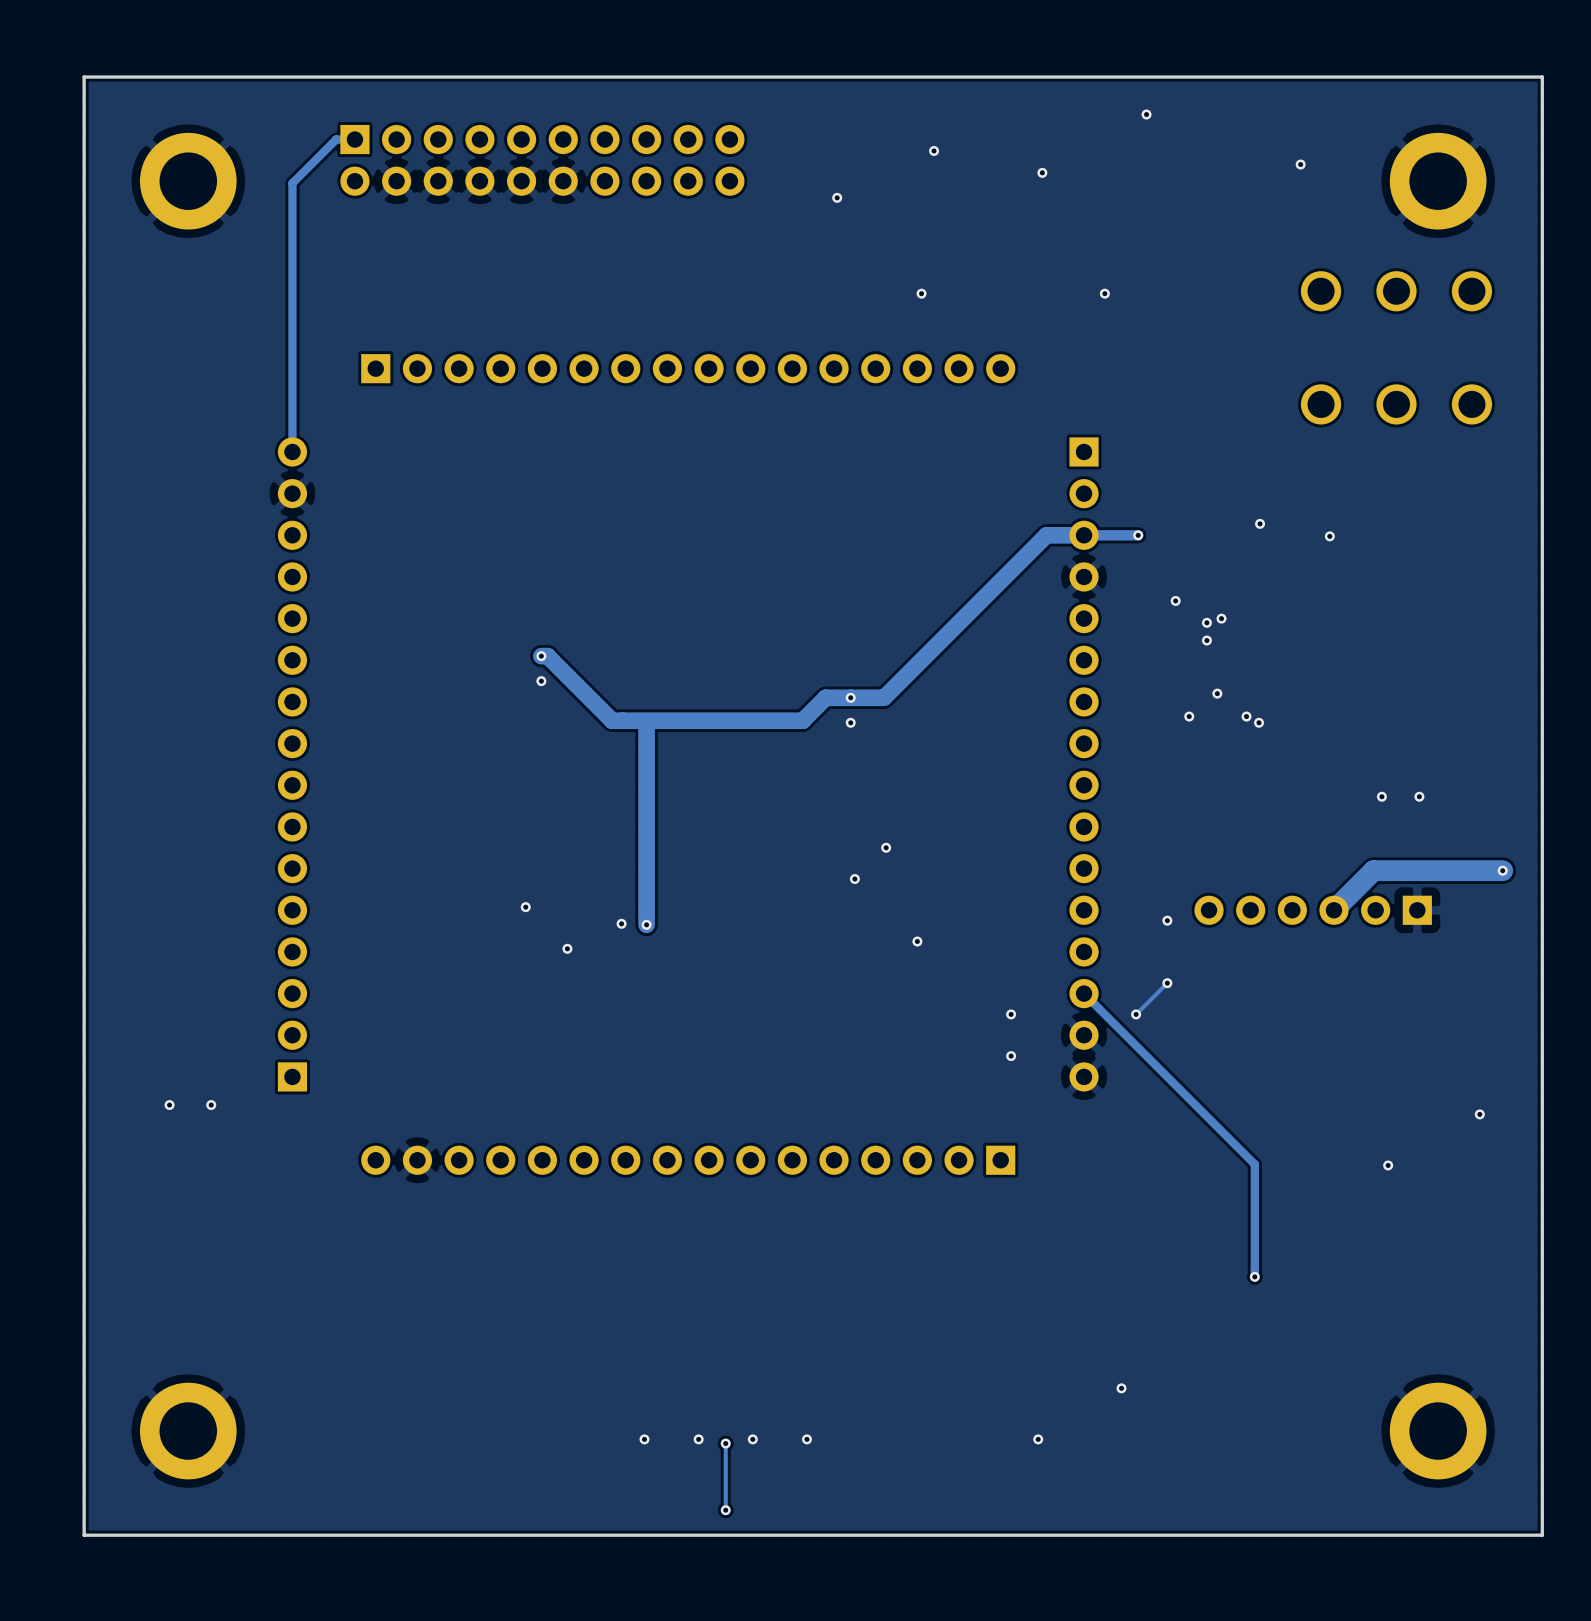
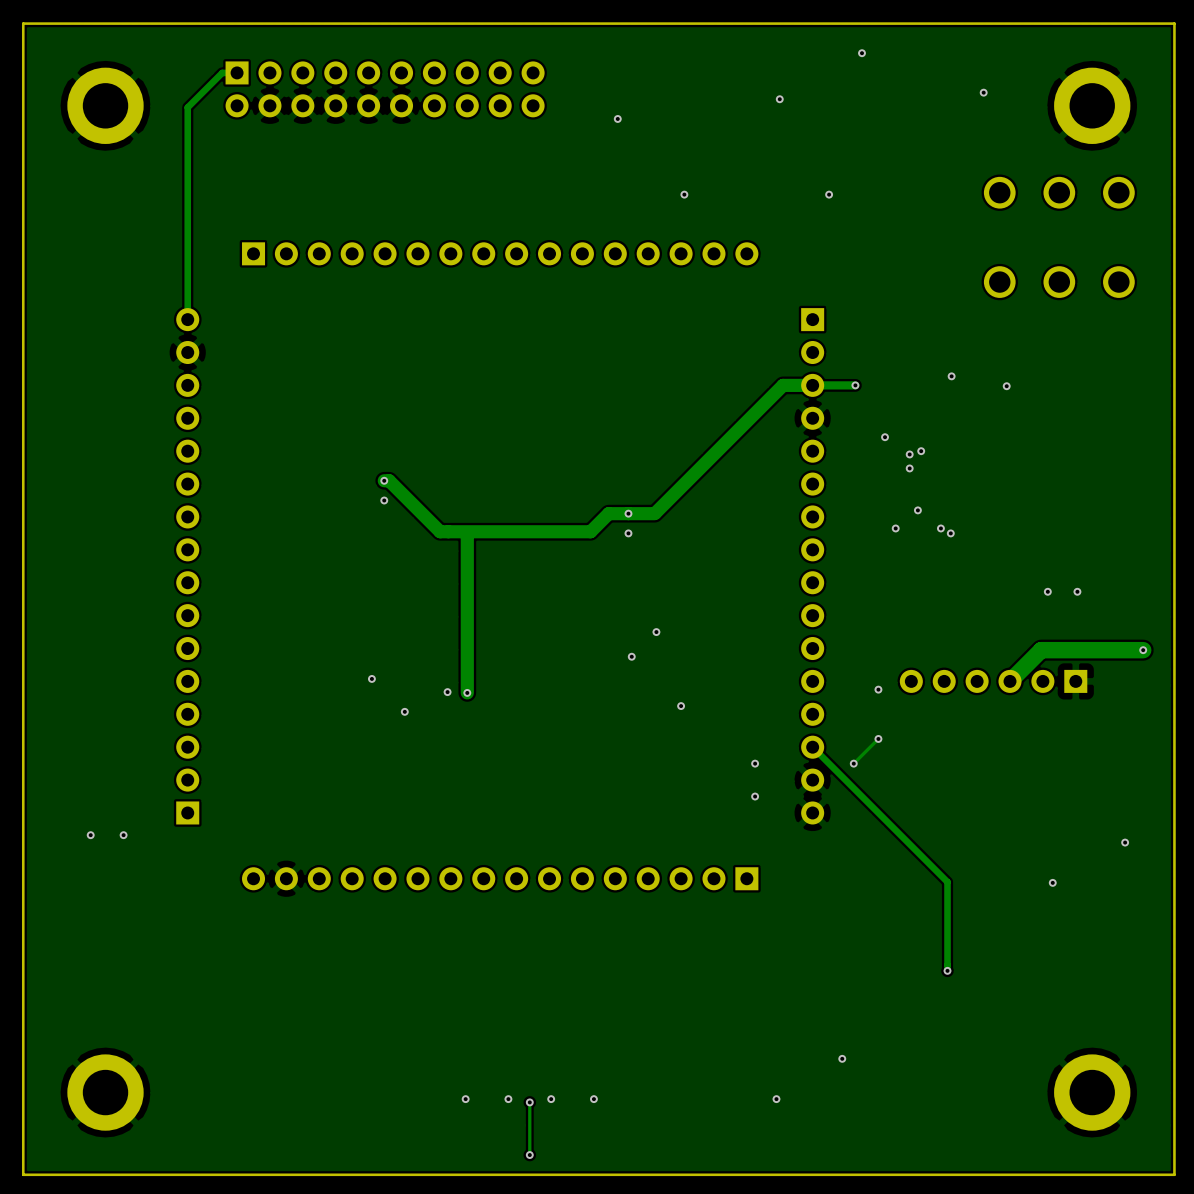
via: (934, 150) -> none

